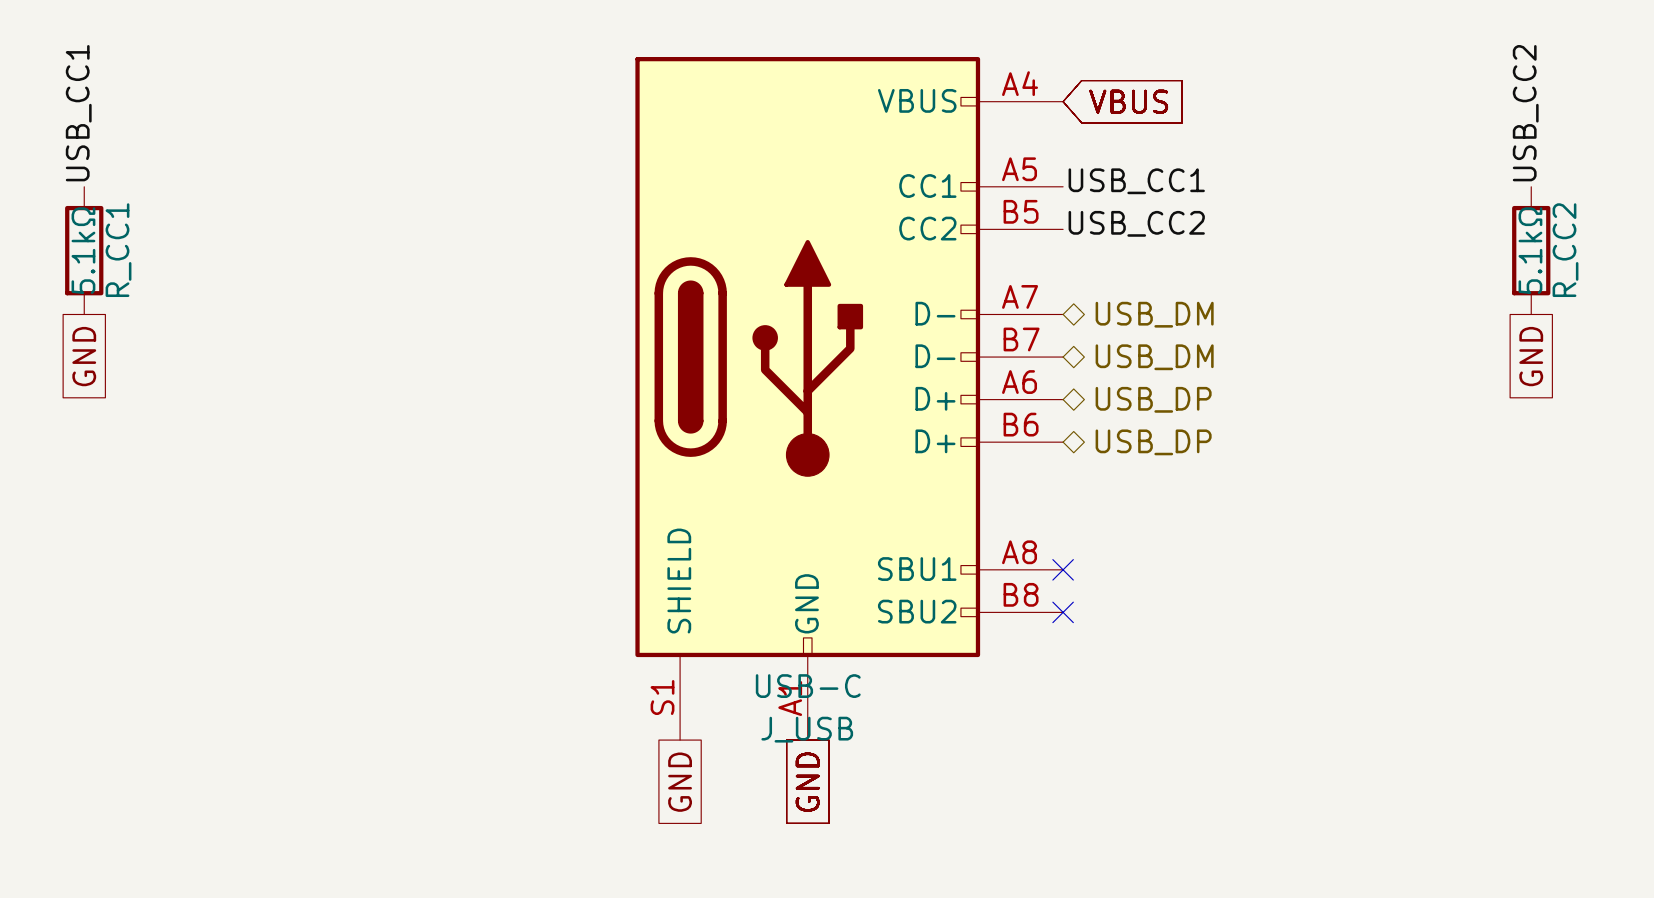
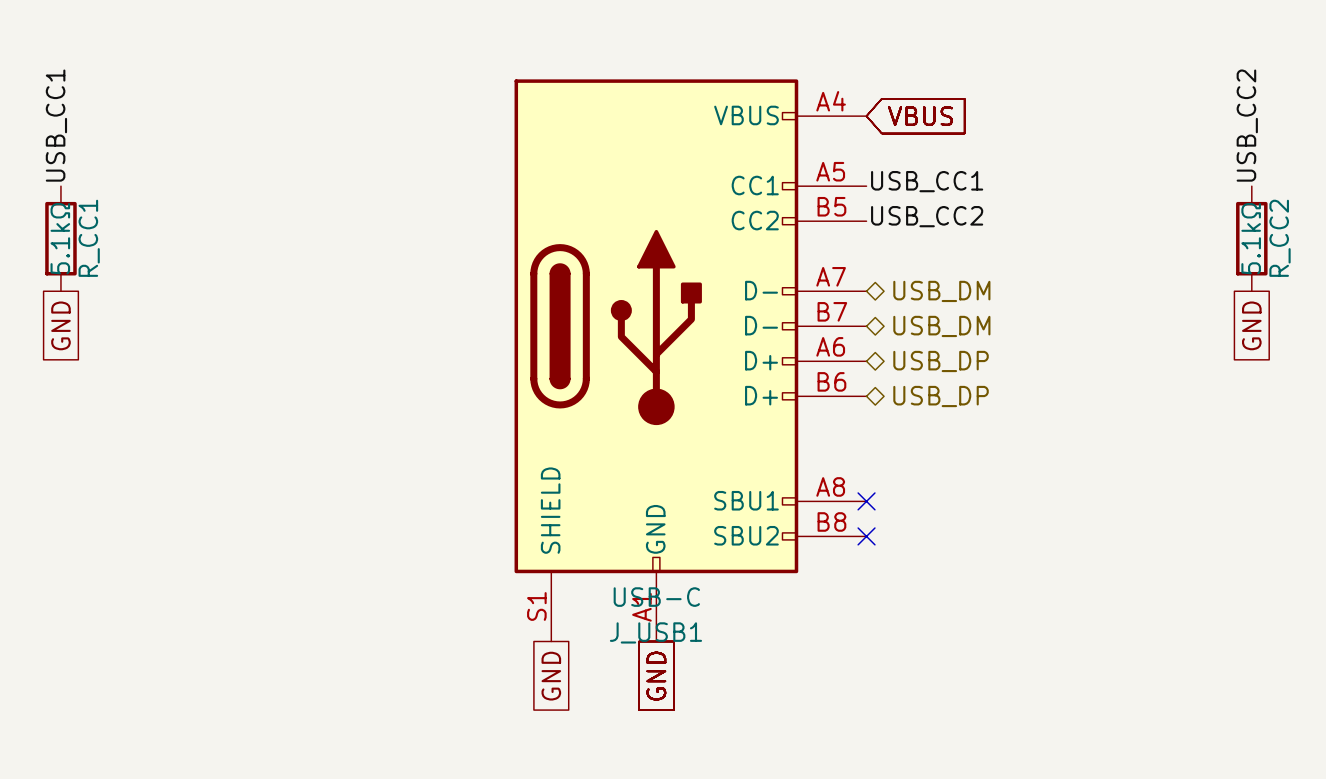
J_USB name: J_USB (807, 729) -> J_USB1 (655, 632)

